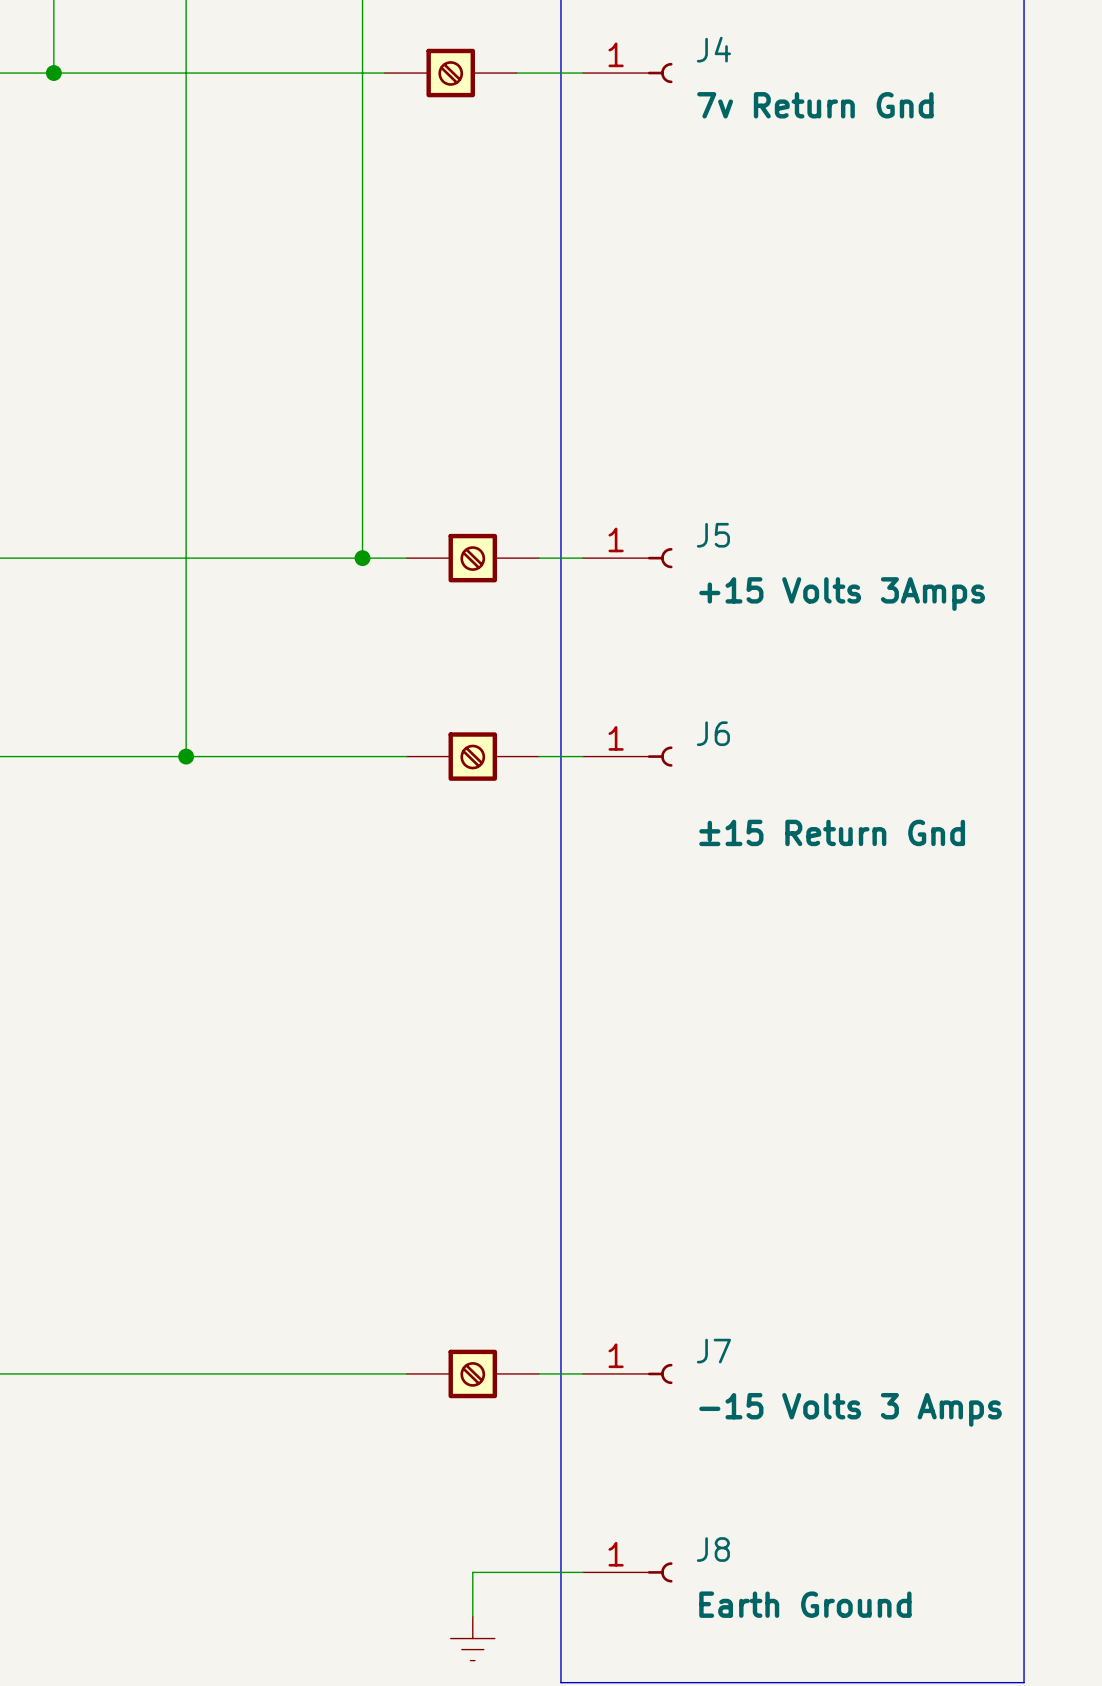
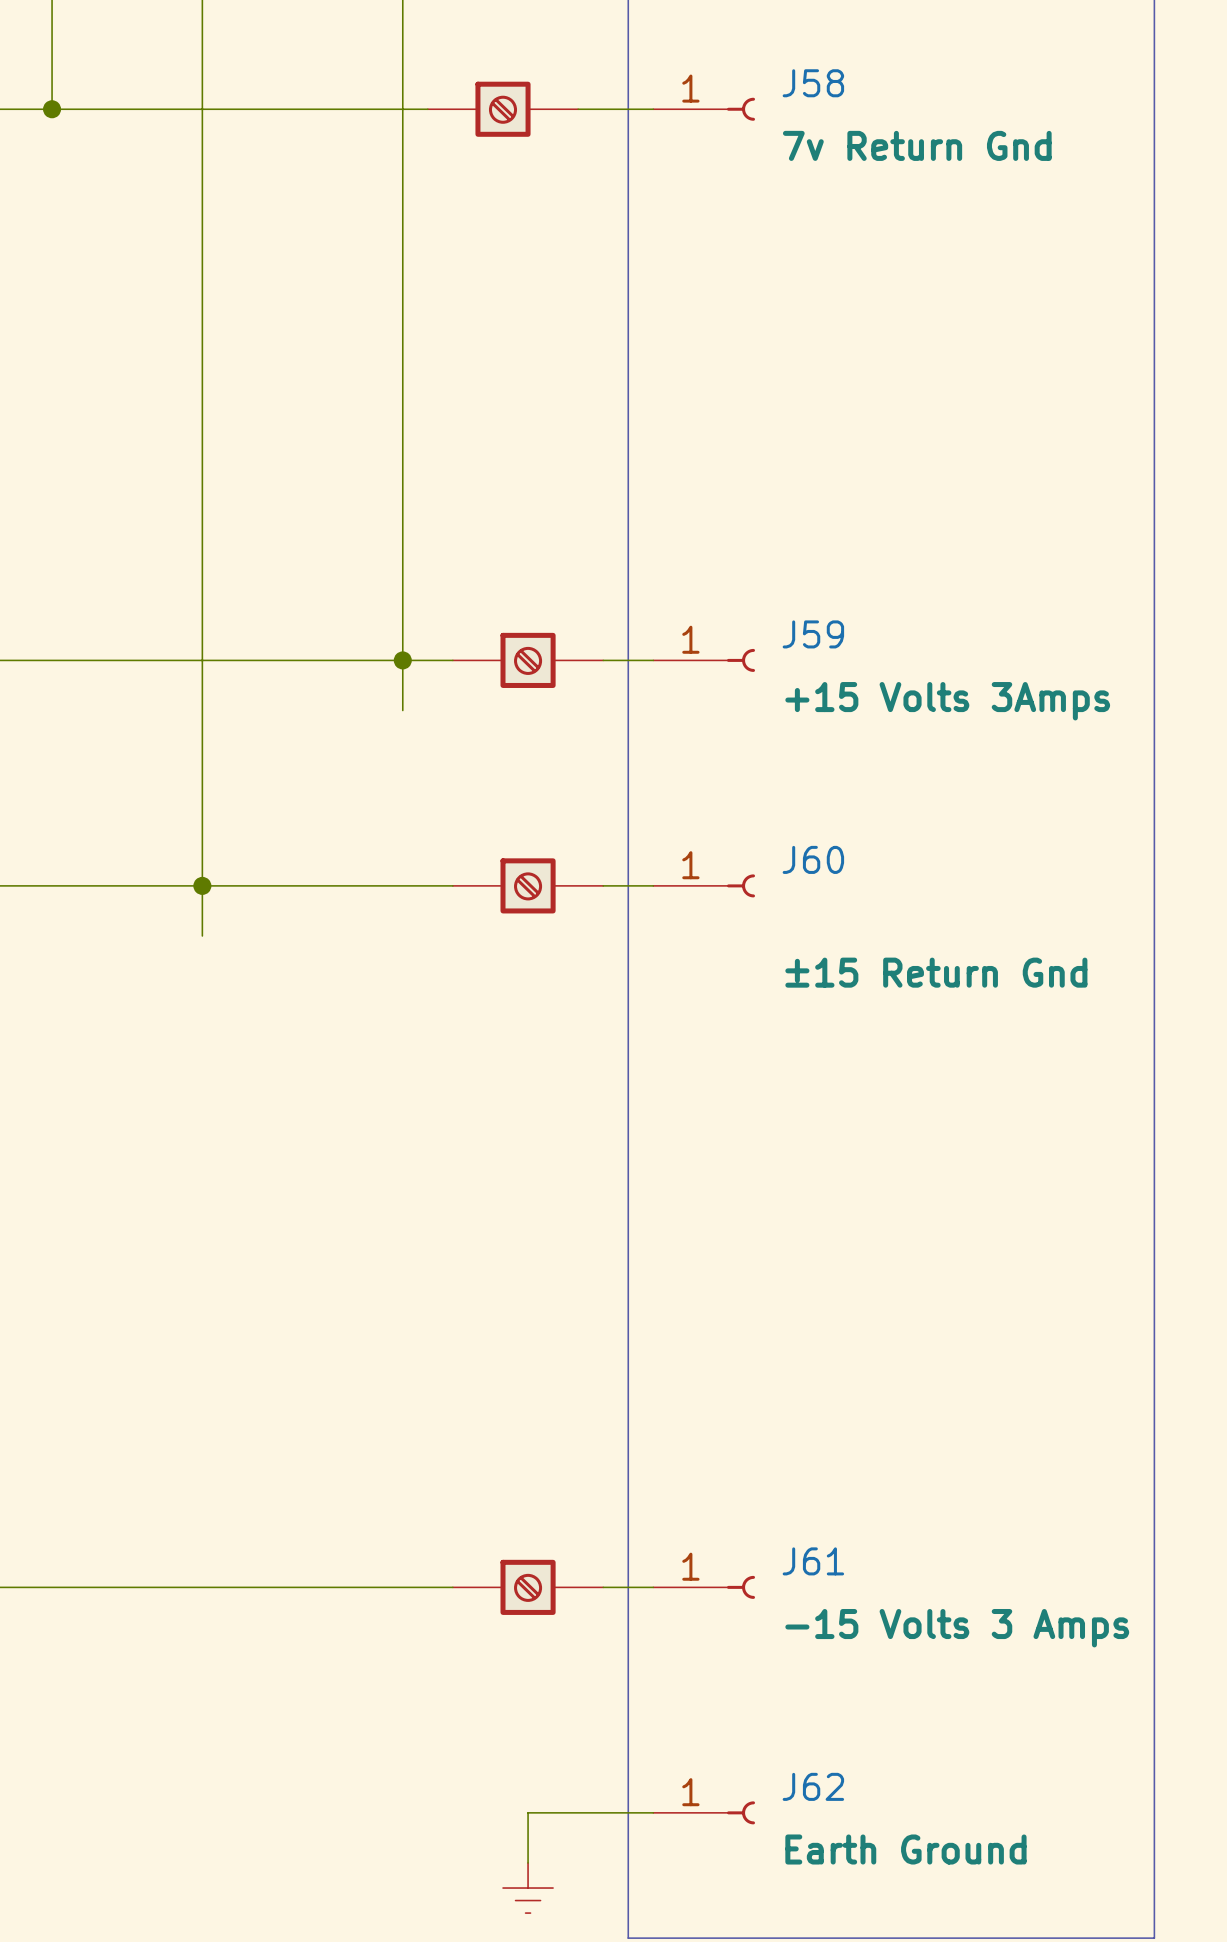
J4 name: J4 (713, 49) -> J58 (813, 83)
J5 name: J5 (713, 535) -> J59 (813, 634)
wire: none -> (402, 660) (402, 710)
J6 name: J6 (713, 733) -> J60 (813, 859)
wire: none -> (202, 885) (202, 936)
J7 name: J7 (713, 1351) -> J61 (813, 1561)
J8 name: J8 (713, 1549) -> J62 (813, 1786)

